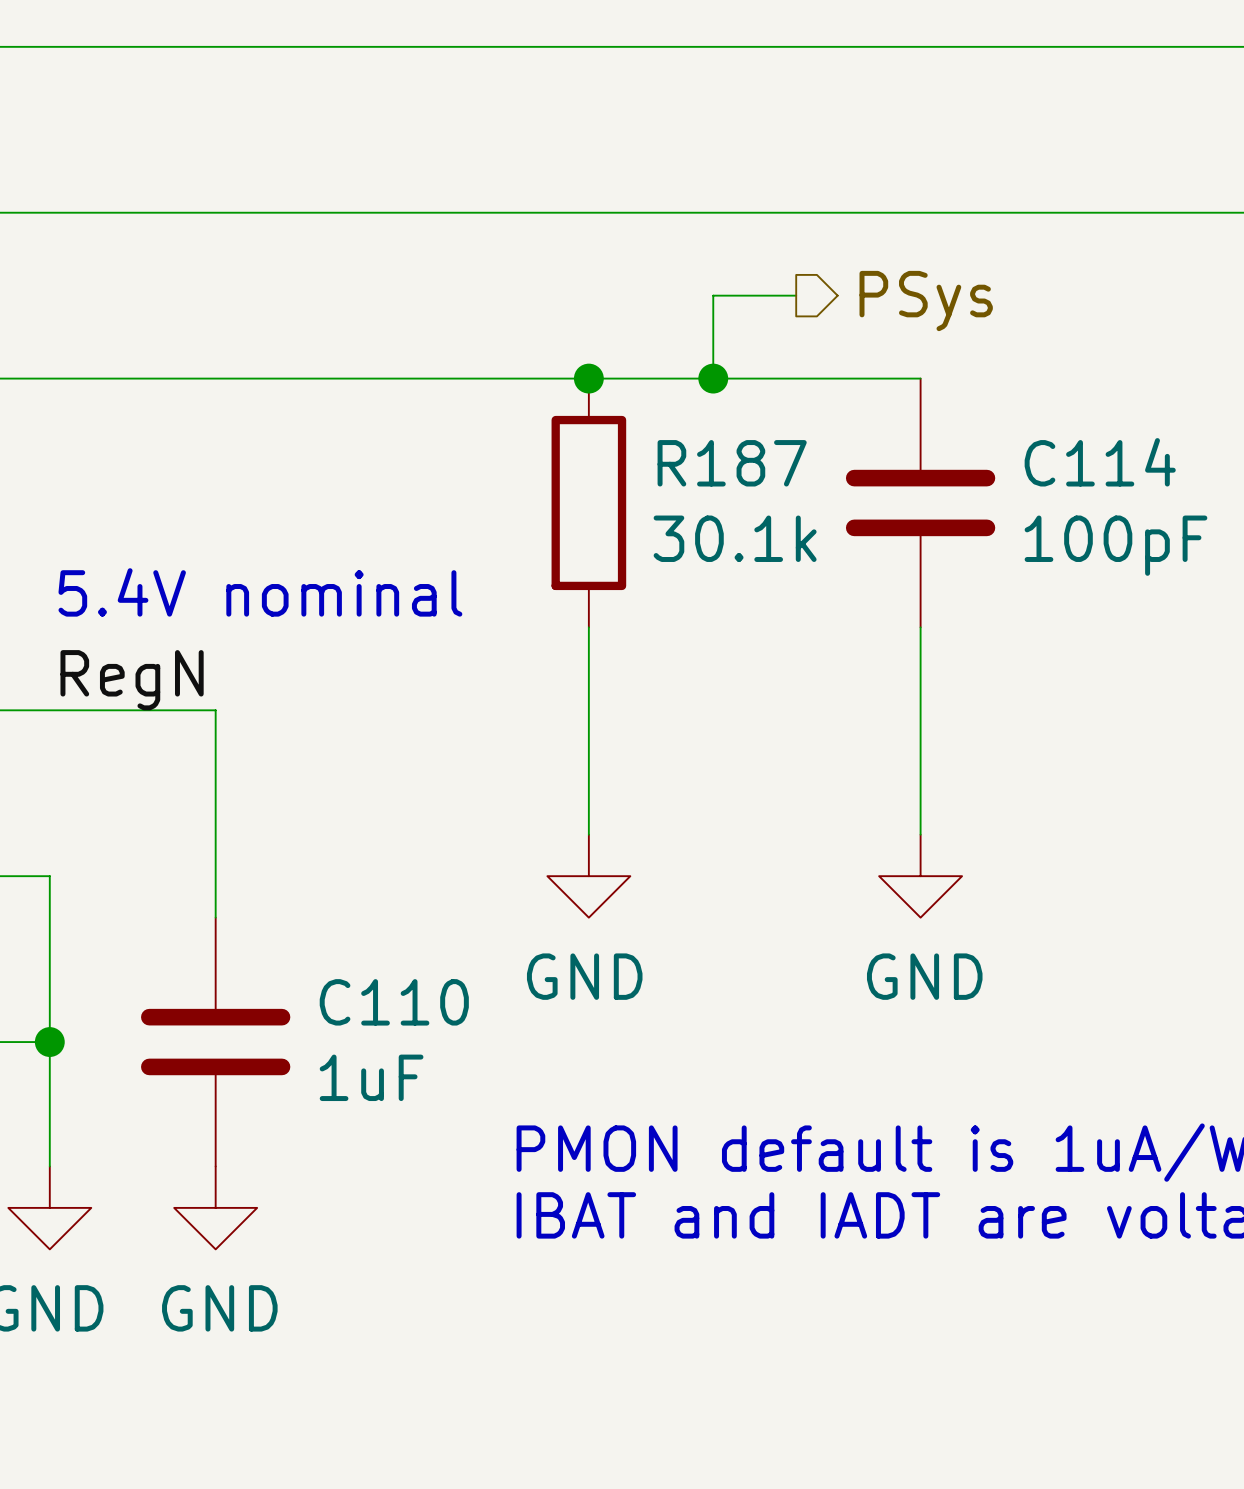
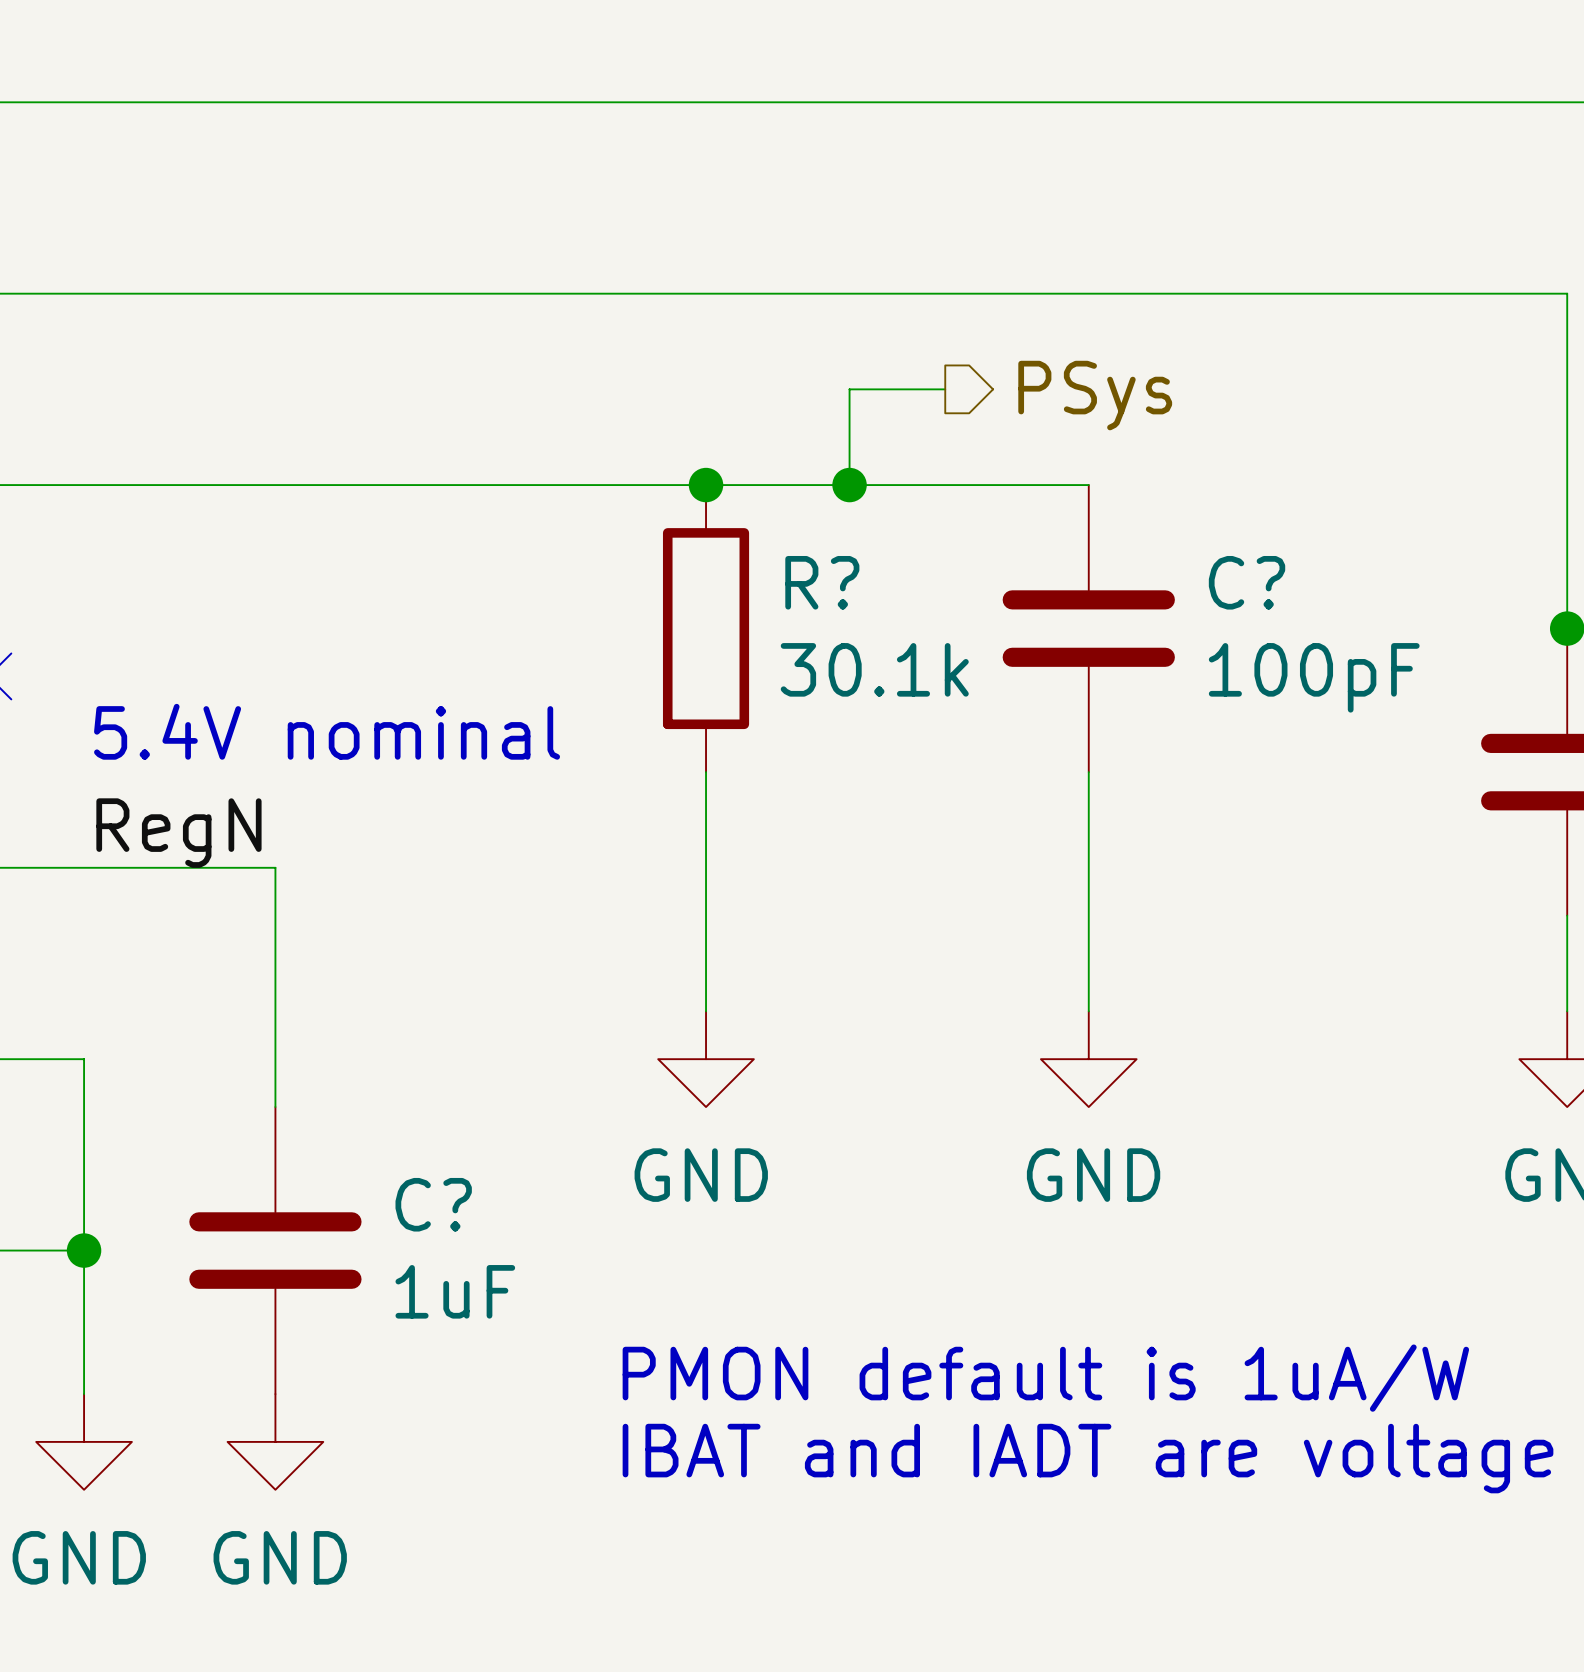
C114 name: C114 (1100, 462) -> C? (1247, 582)
R187 name: R187 (732, 463) -> R? (822, 582)
C110 name: C110 (394, 1002) -> C? (433, 1204)

